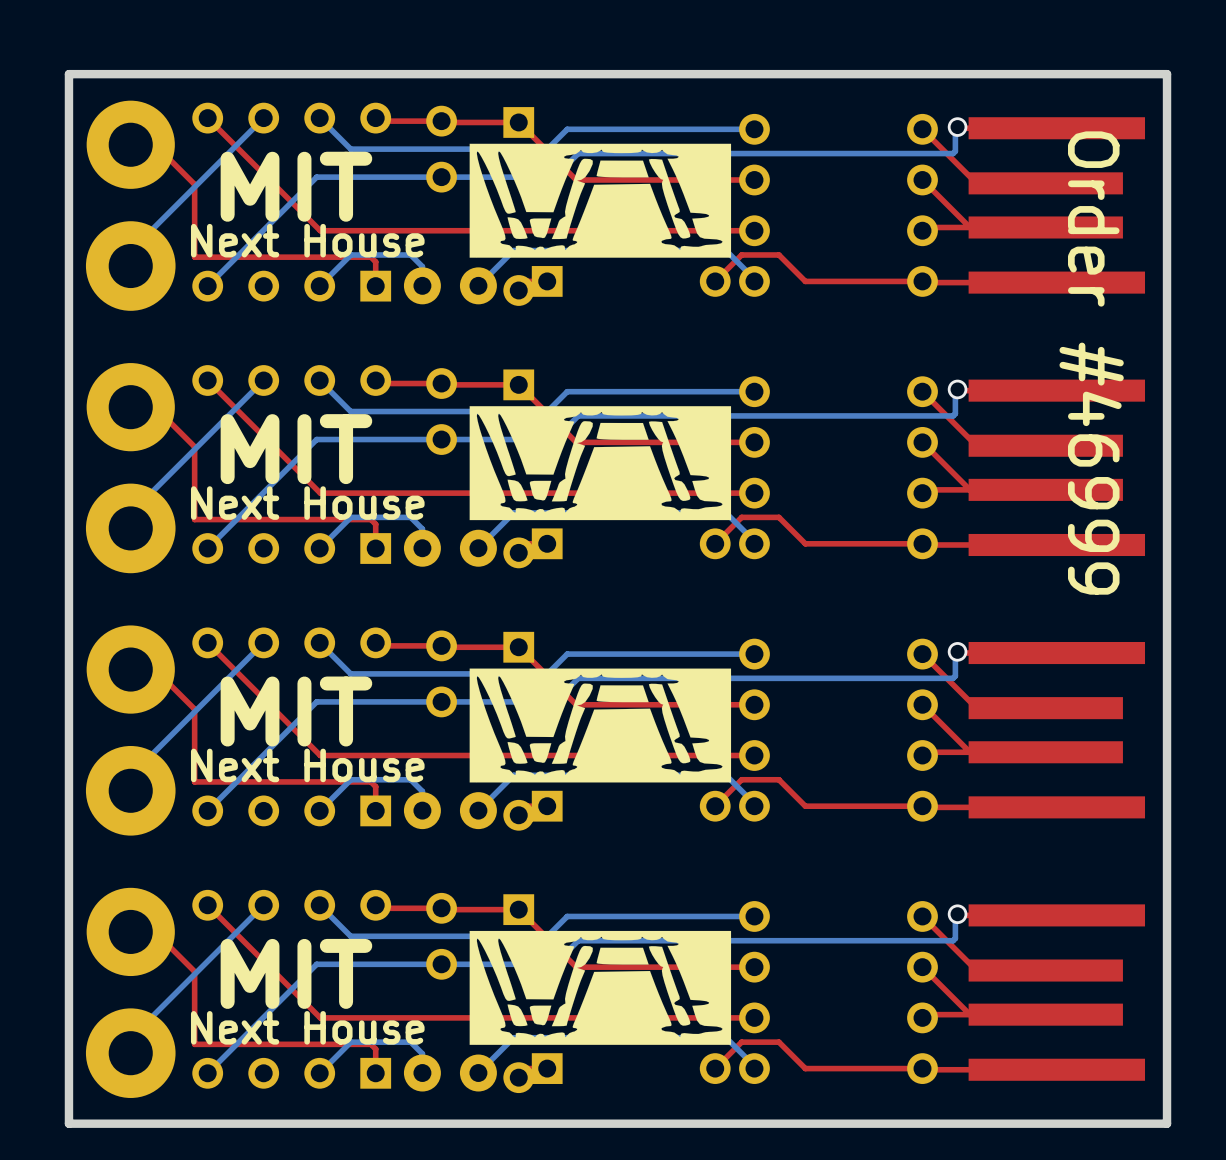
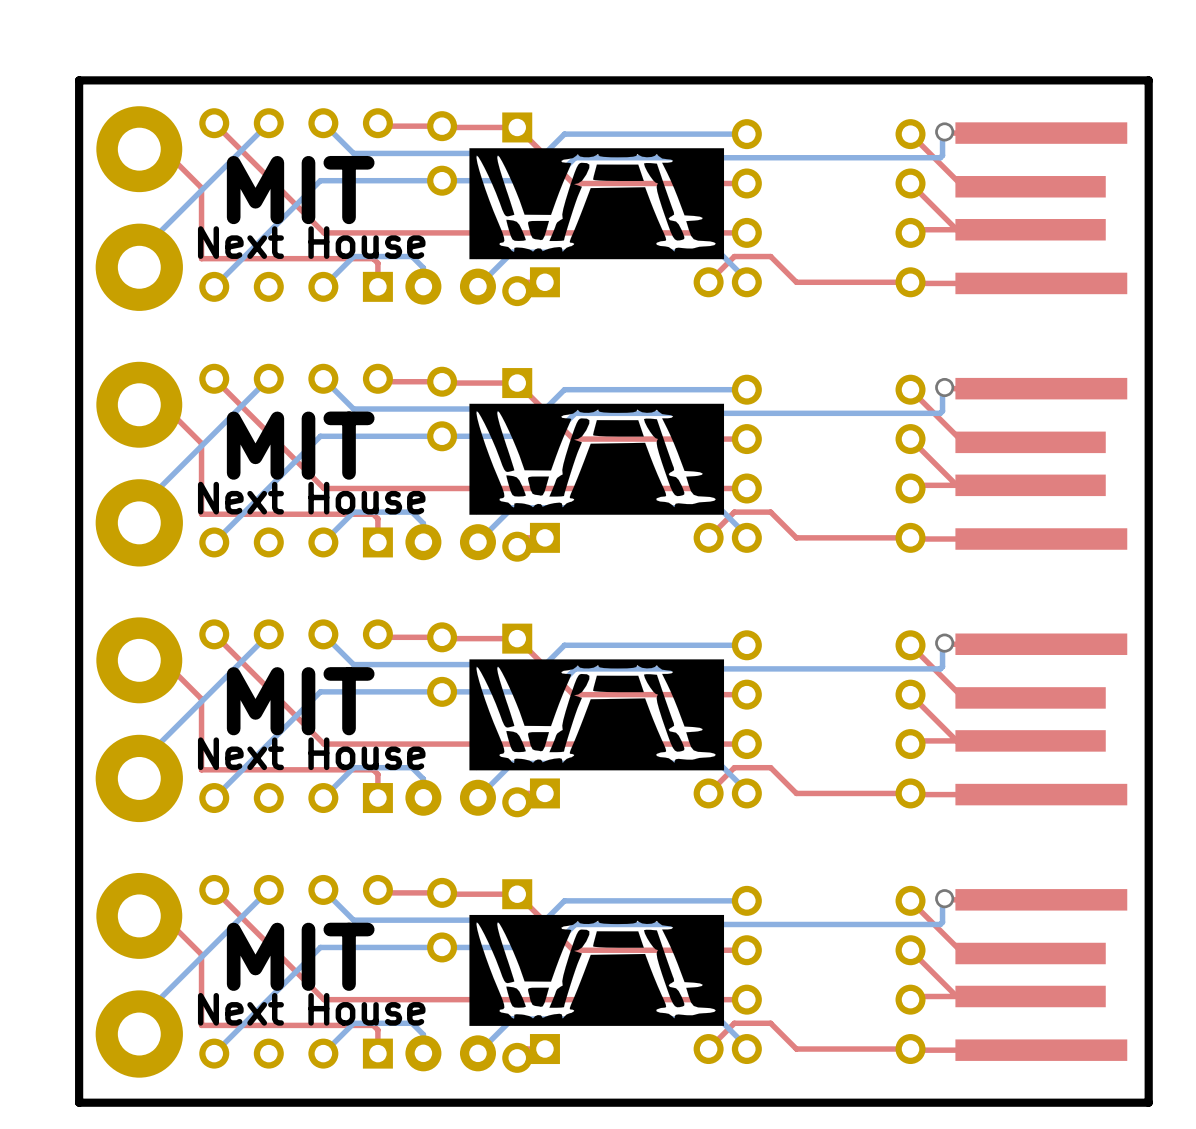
text: Order #46999 (1091, 363) -> none

